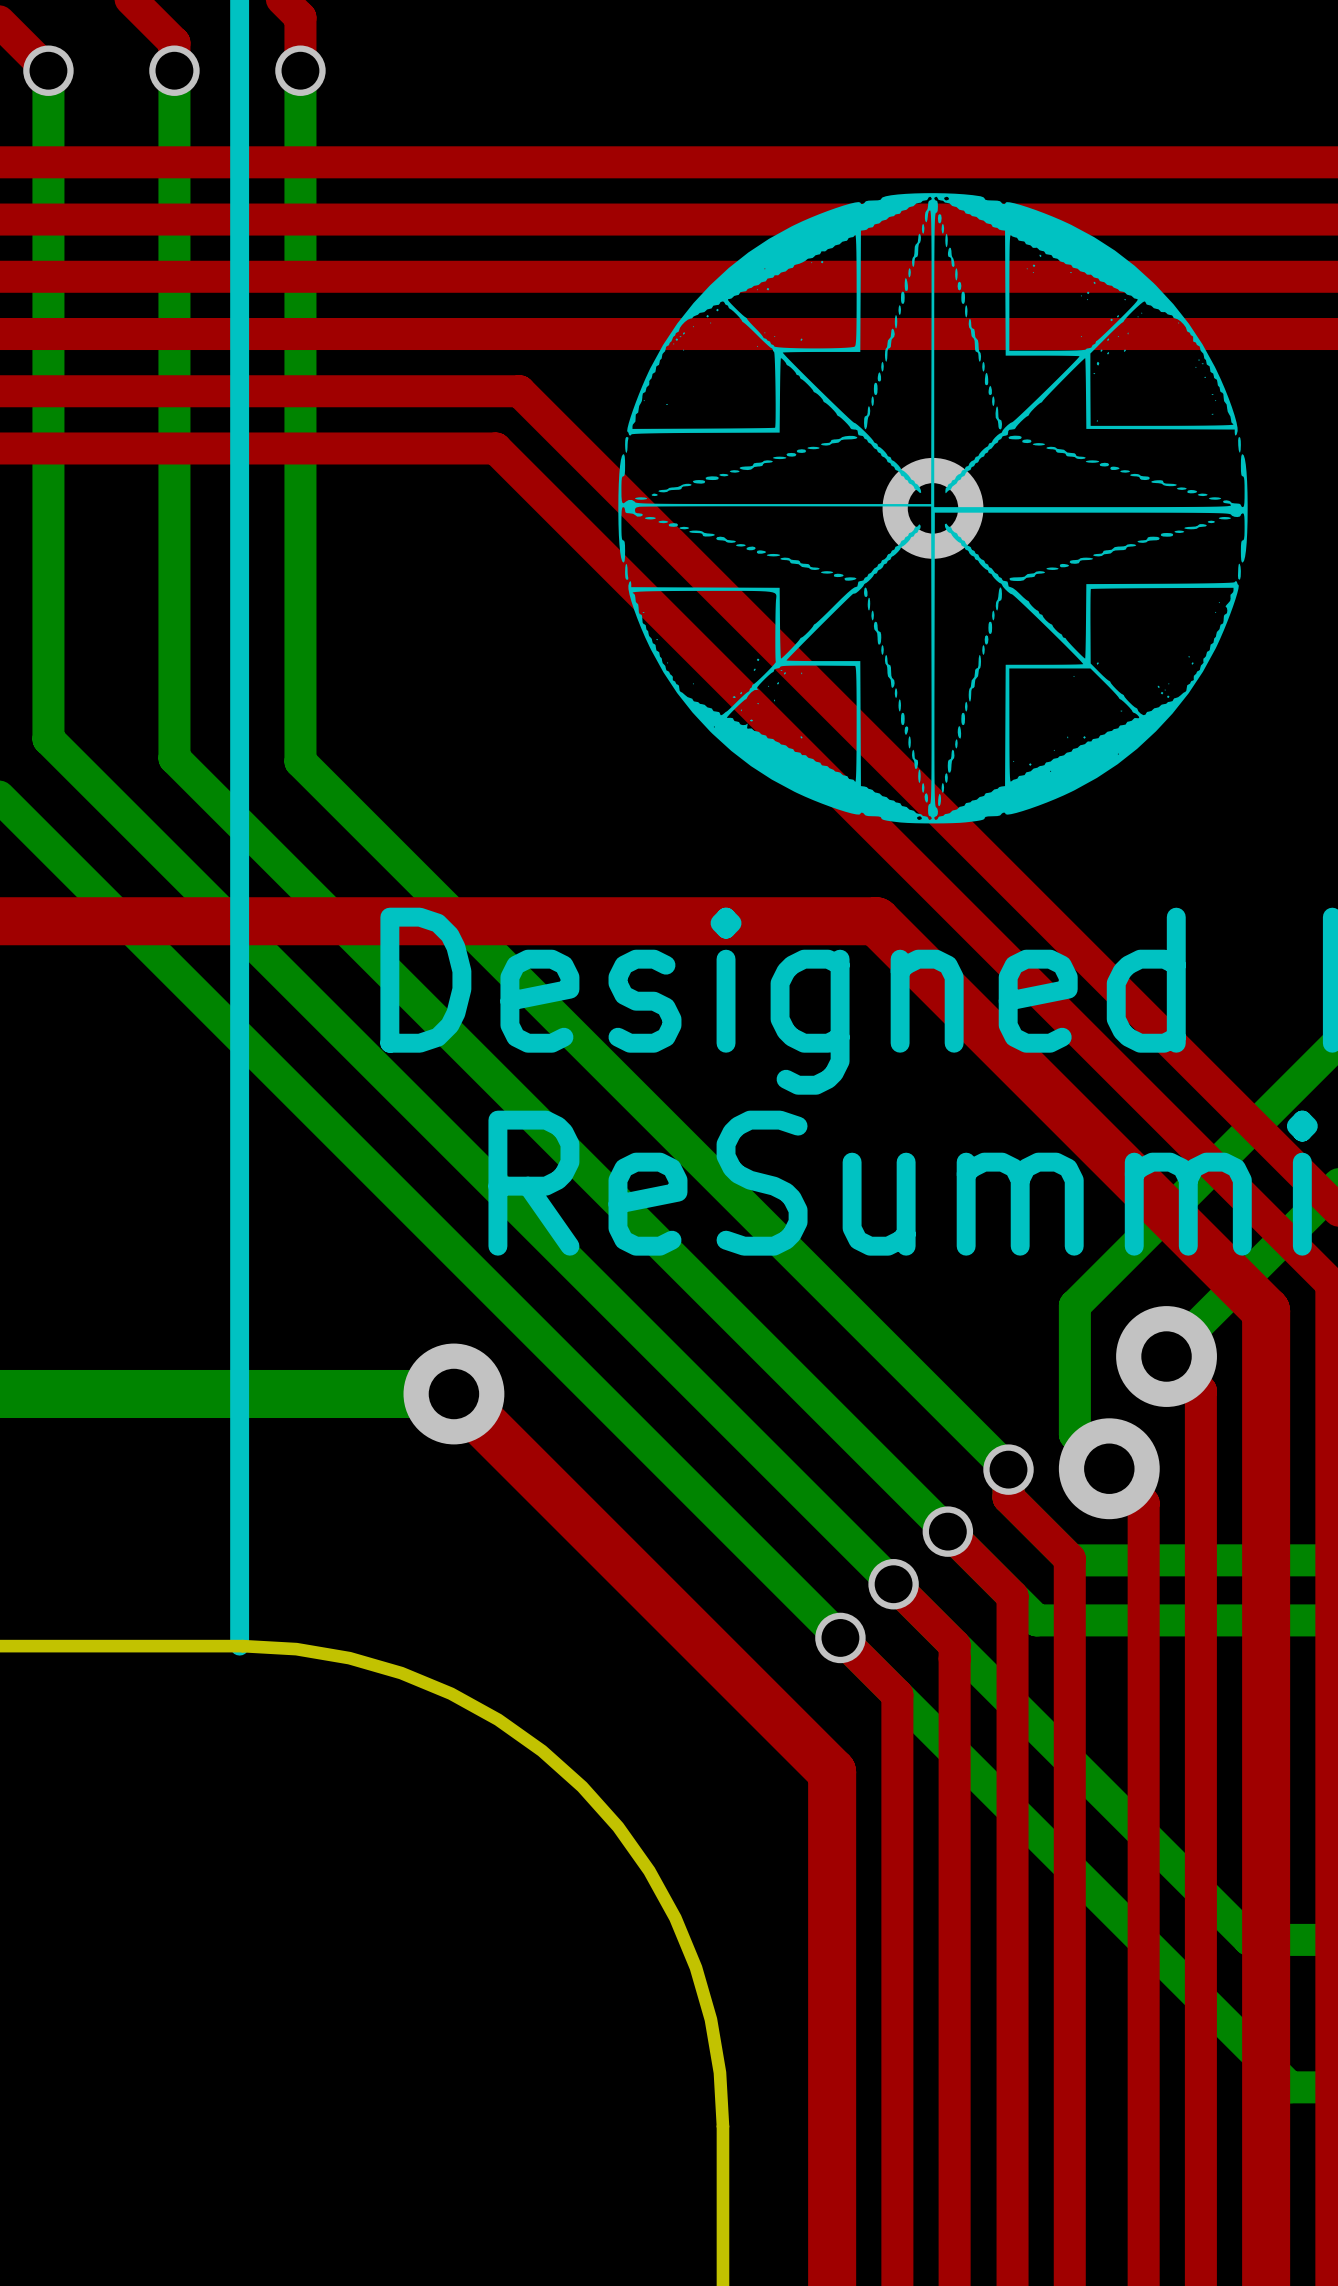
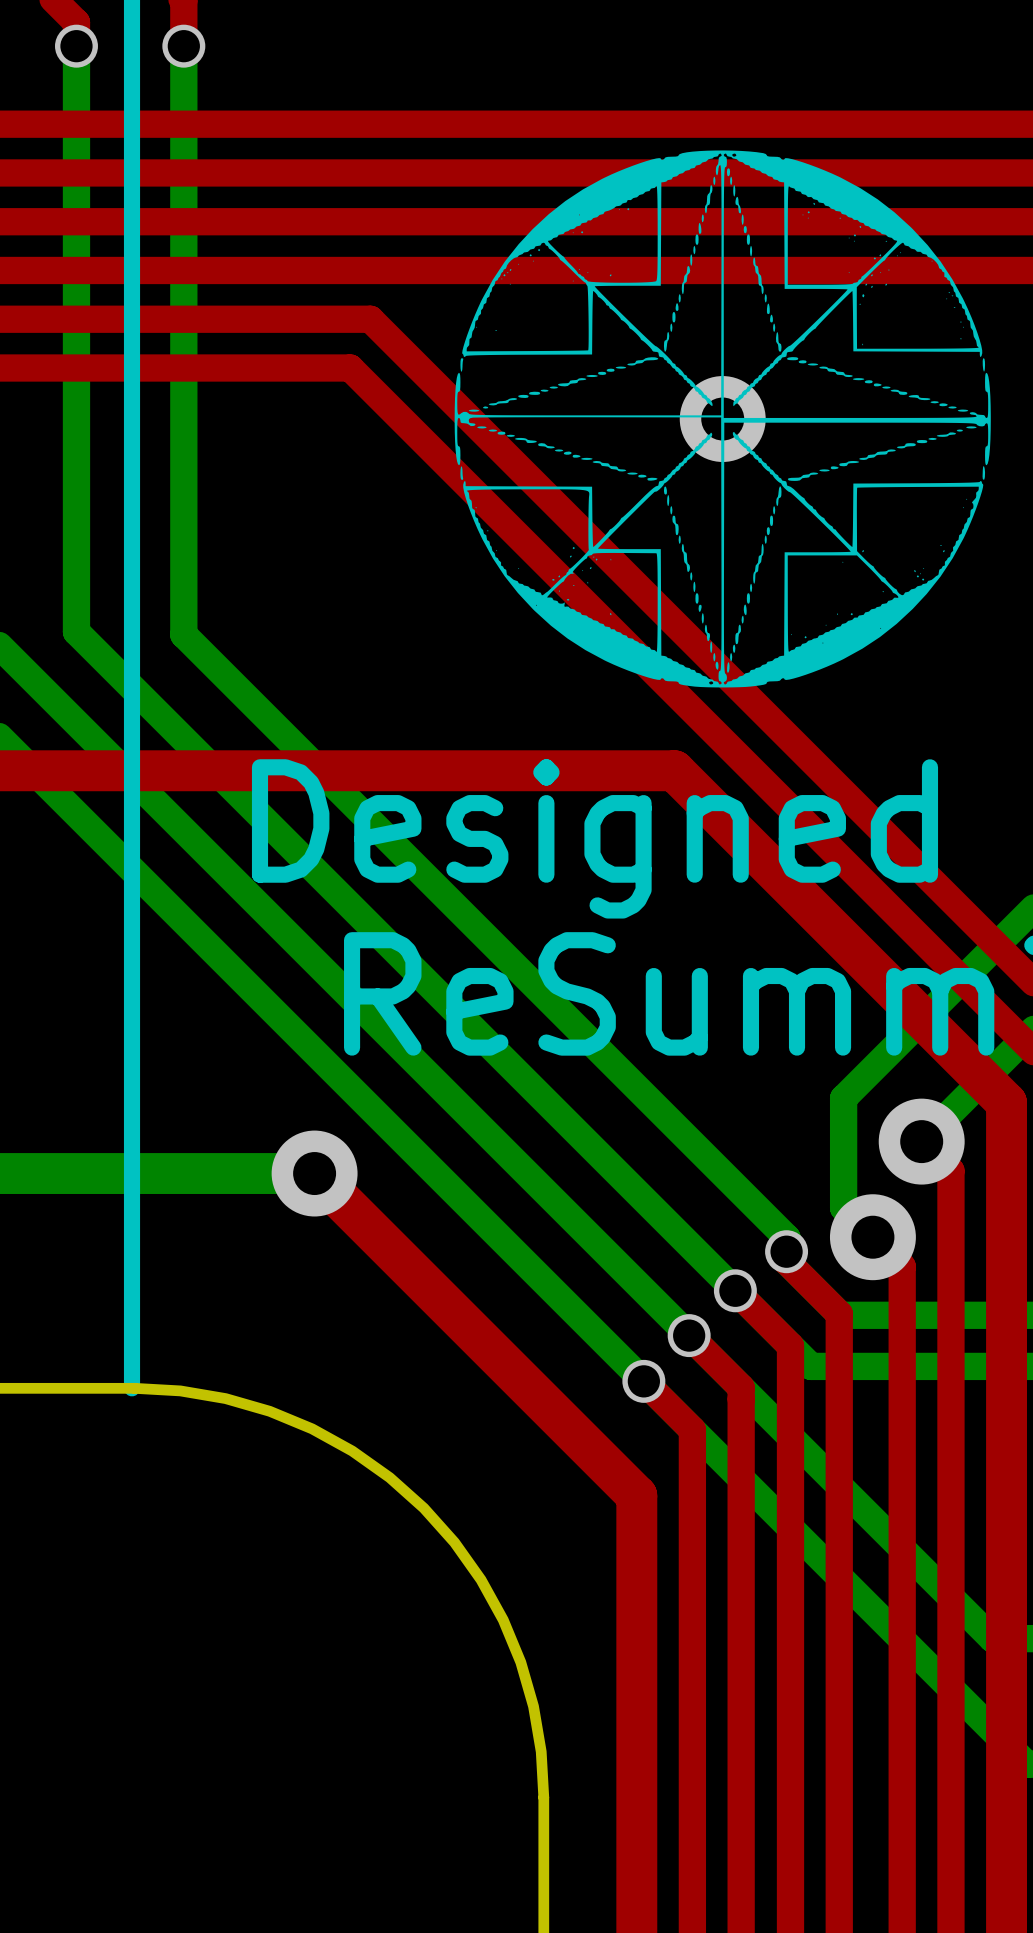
via position: (1008, 1469) -> (786, 1251)

